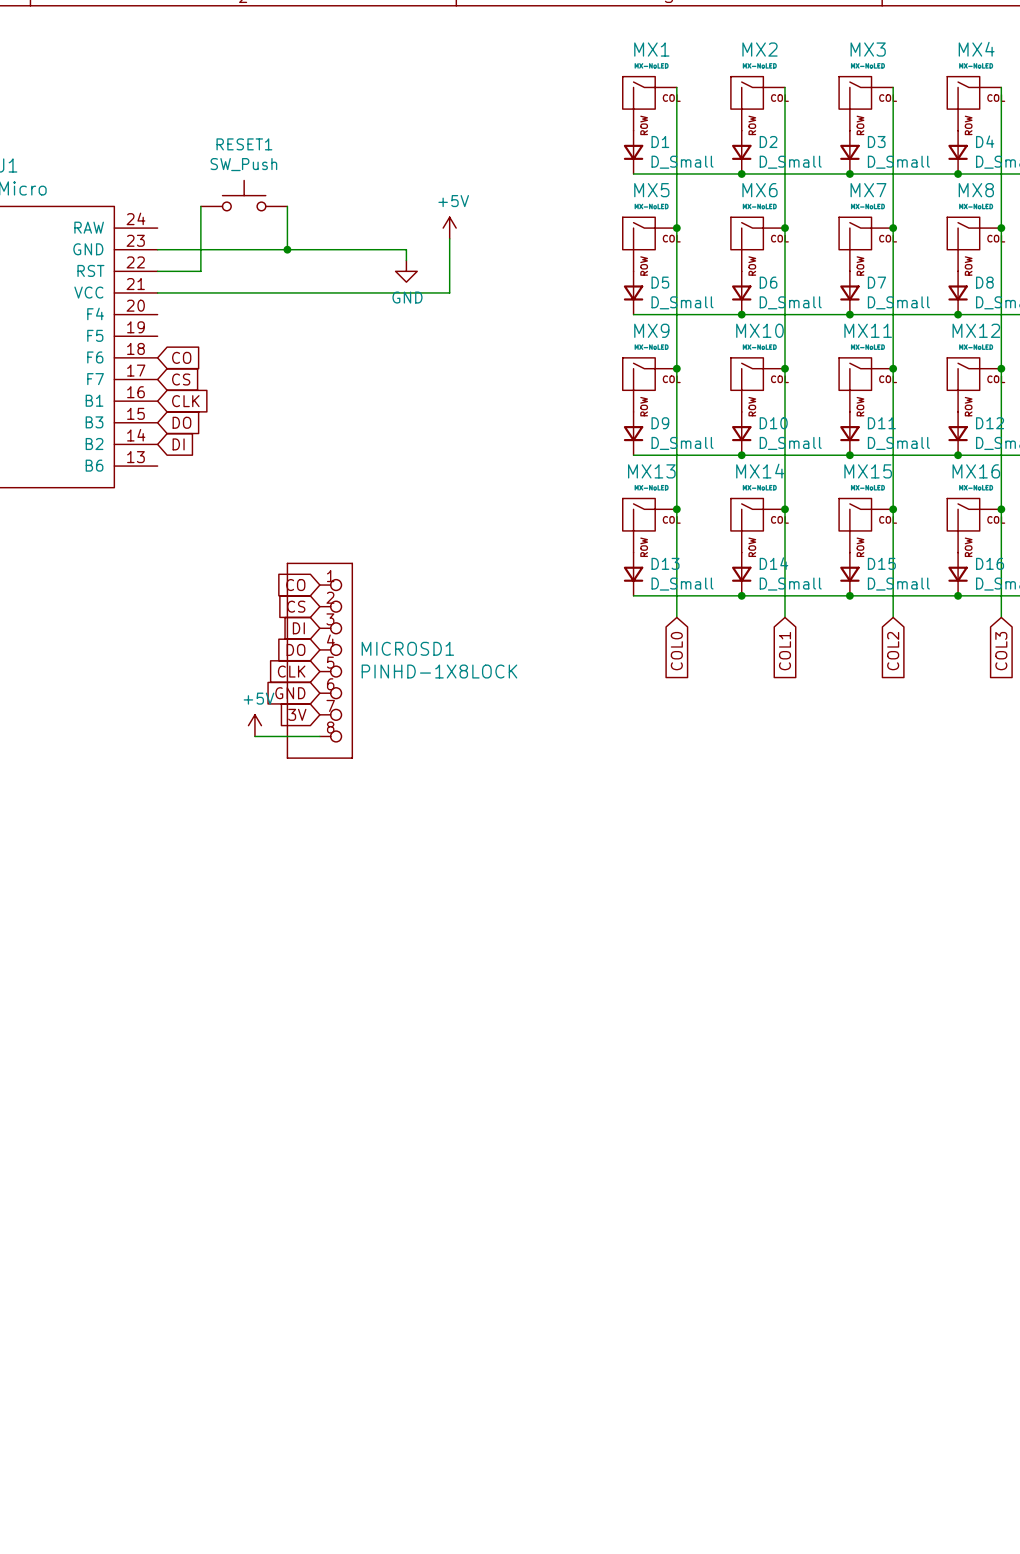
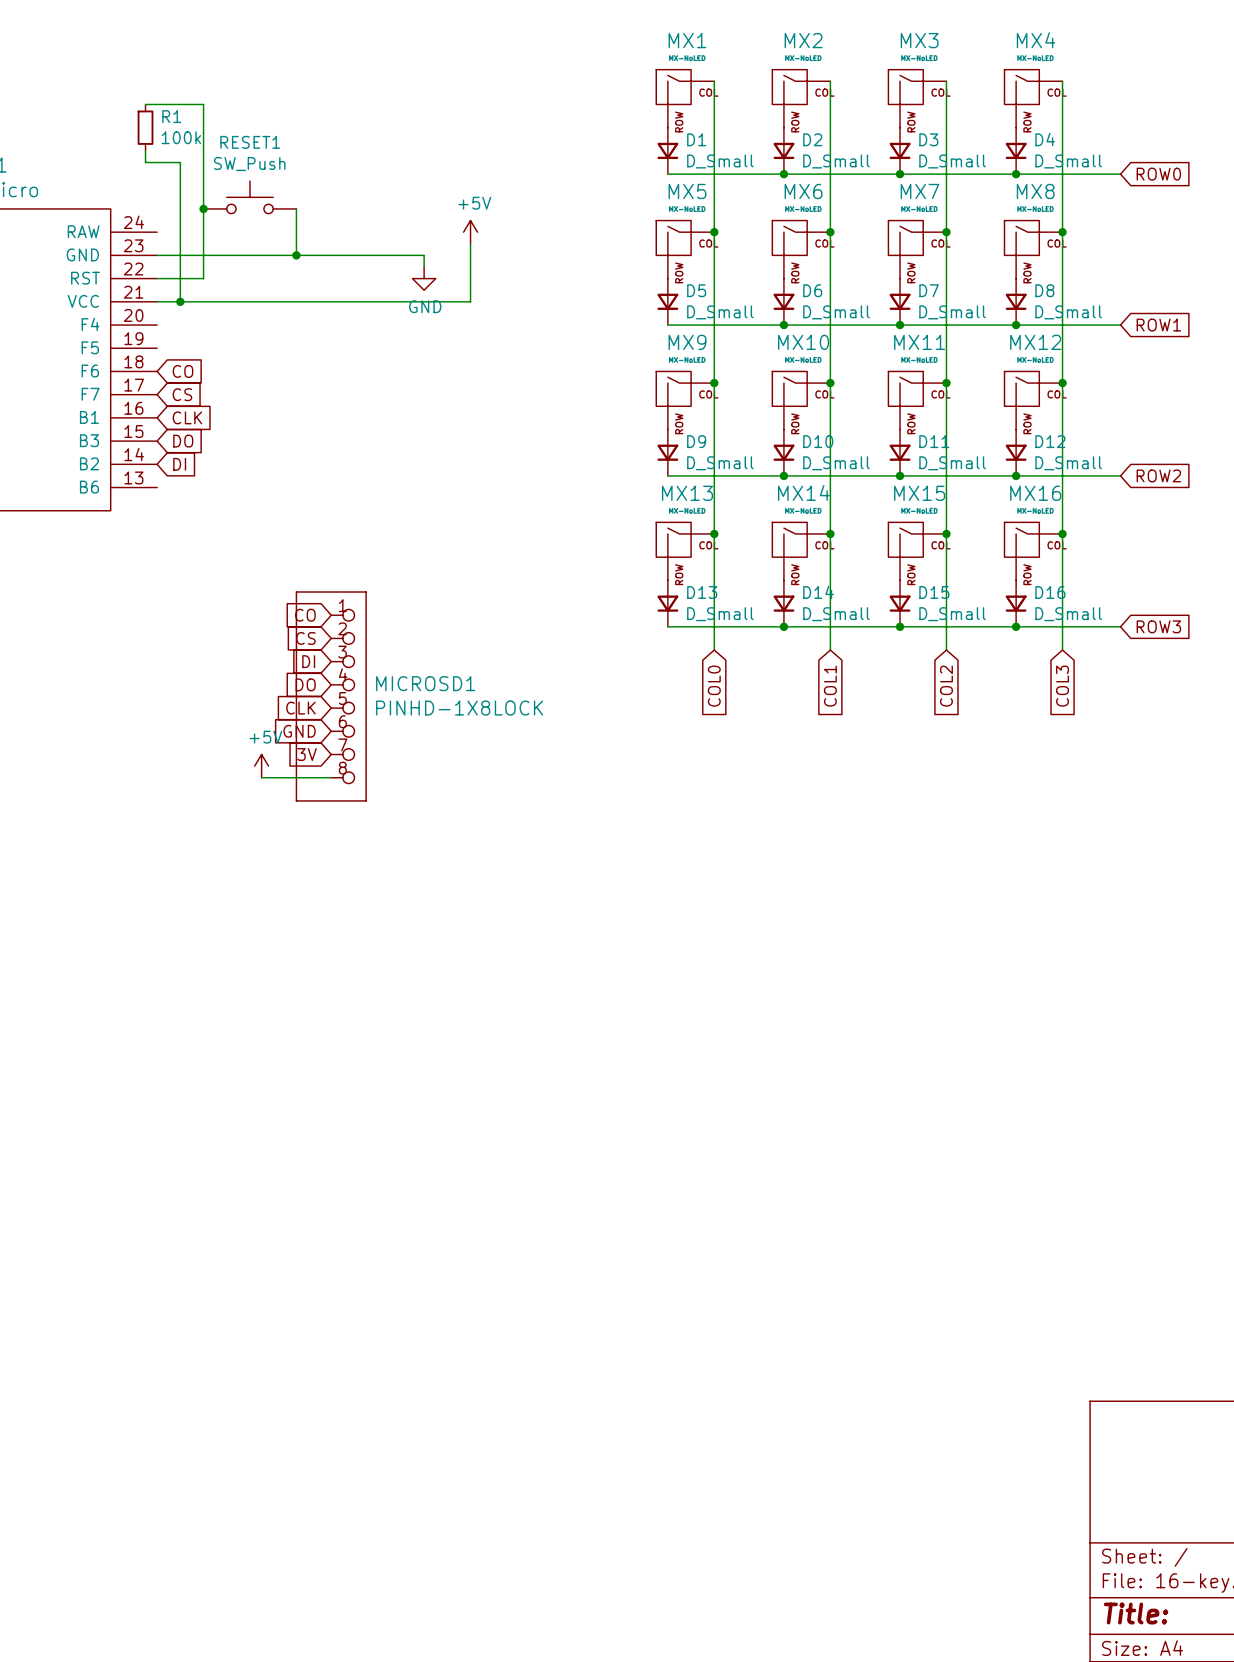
wire: none -> (145, 104) (203, 104) (203, 208)
R1: none -> 100k (145, 127)
wire: none -> (145, 150) (145, 162) (180, 162) (180, 301)
junction: none -> (203, 208)
junction: none -> (180, 301)

